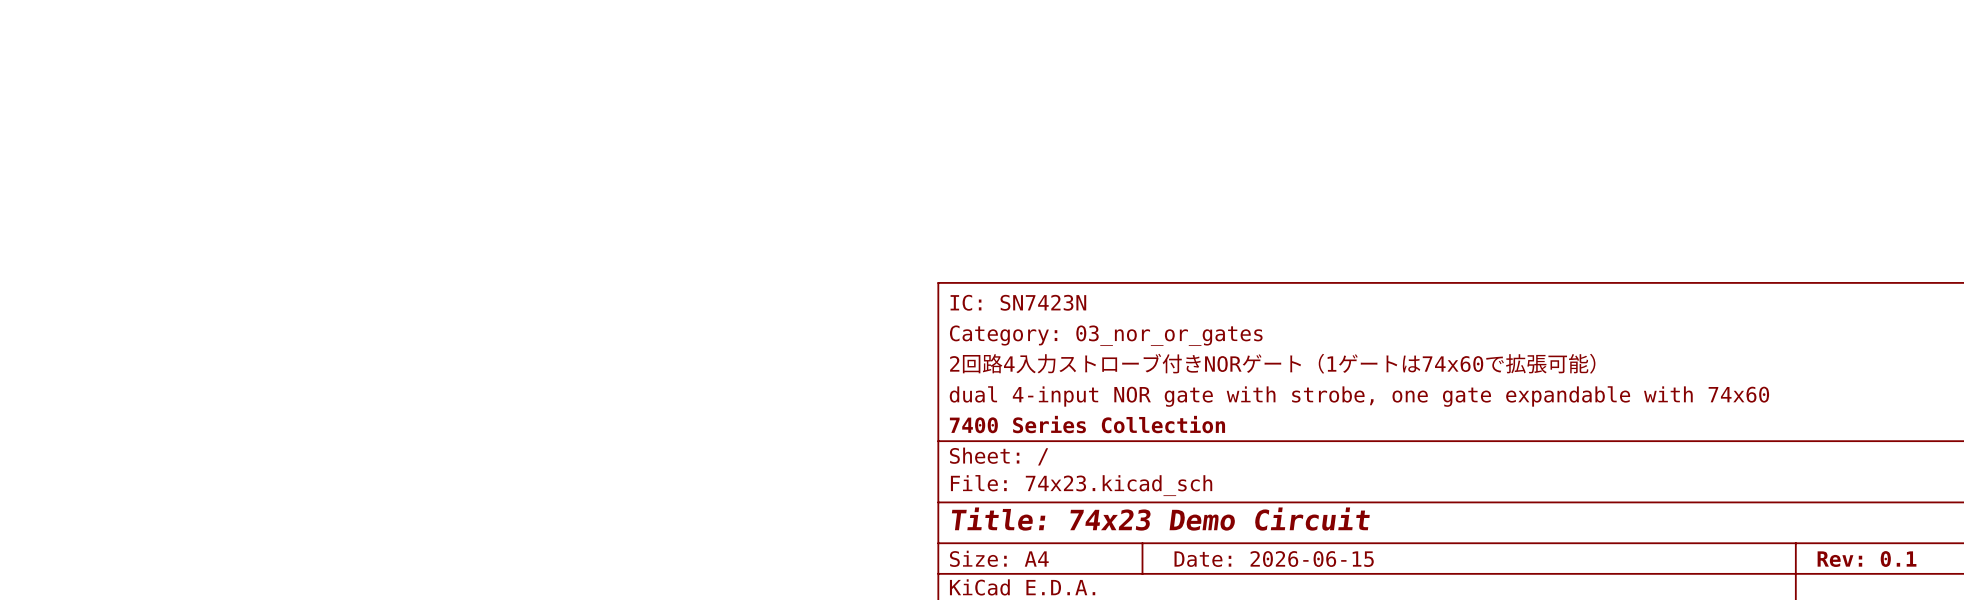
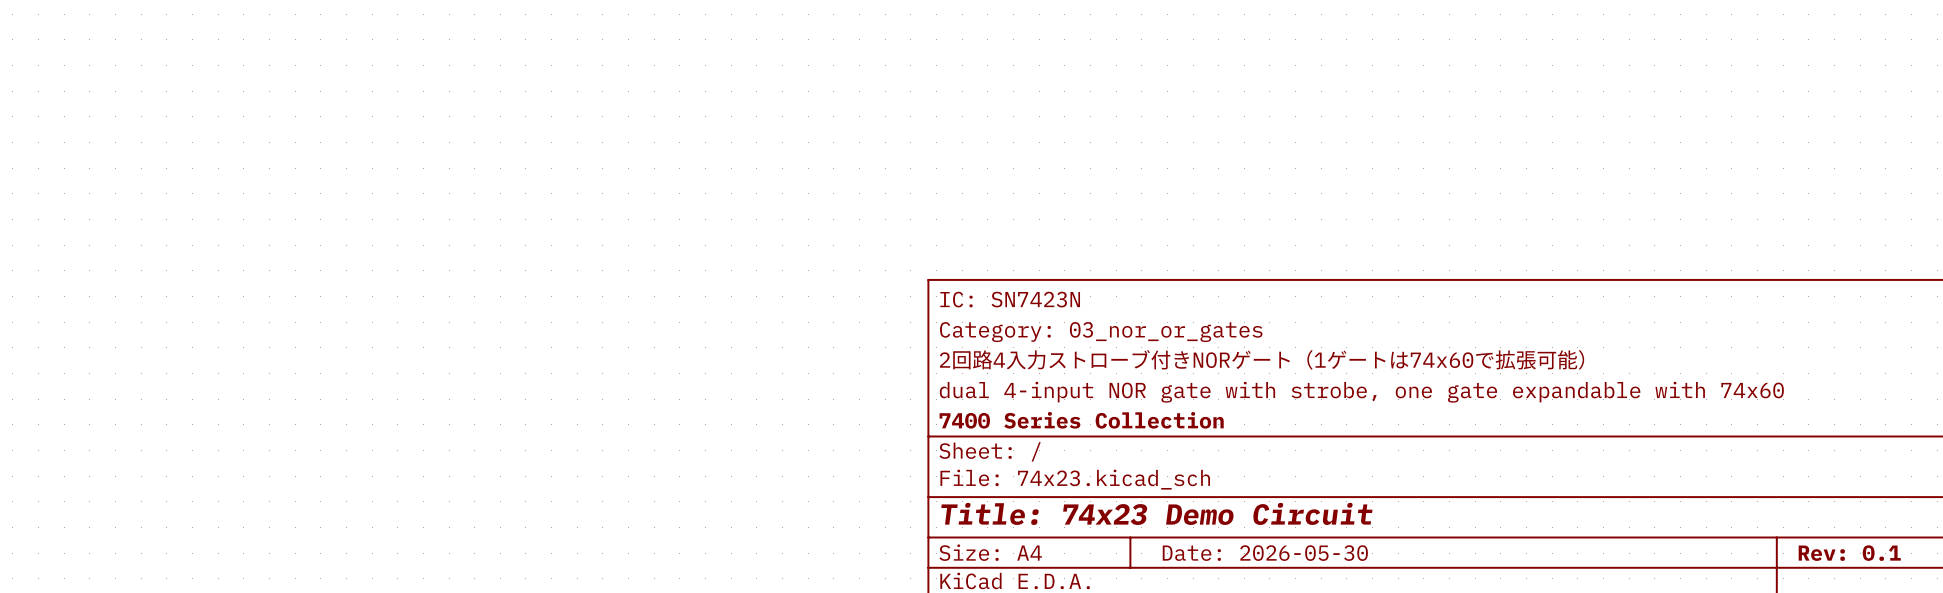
title block: Date: 2026-06-15 (1274, 559) -> Date: 2026-05-30 (1265, 553)

